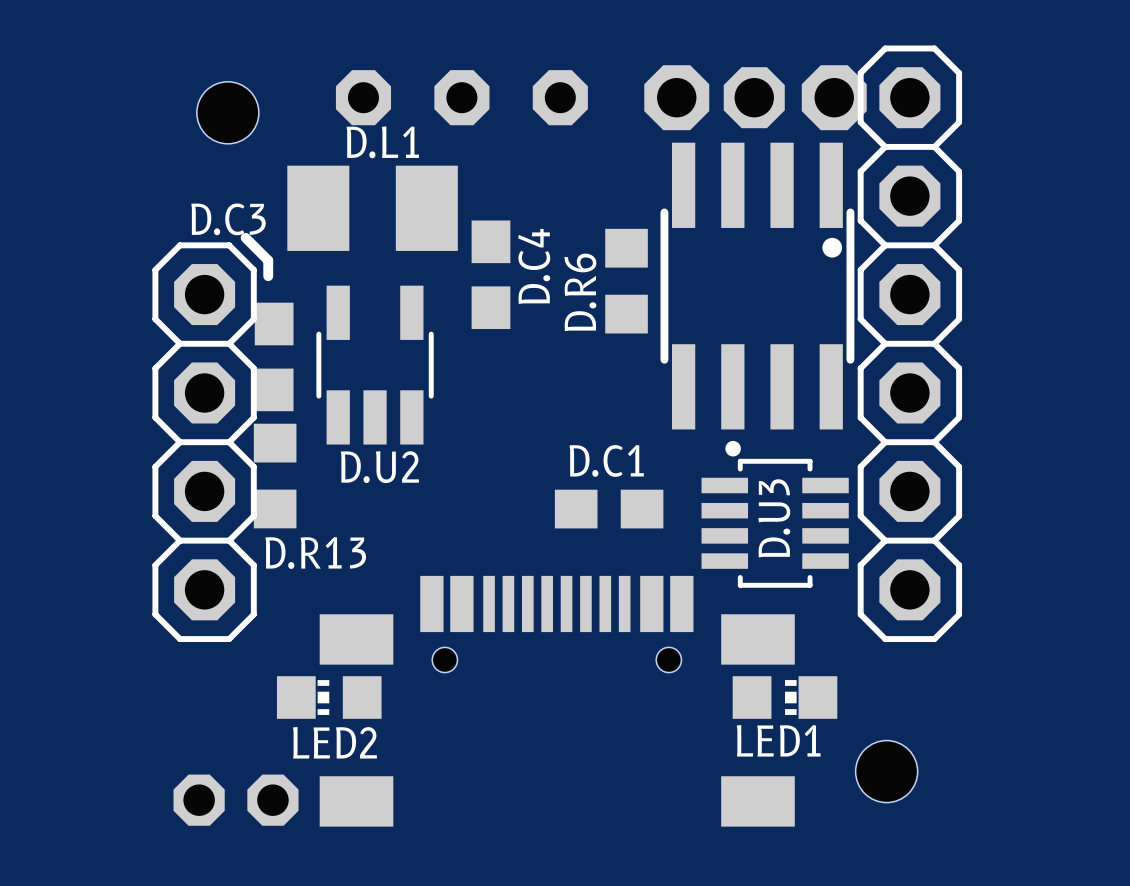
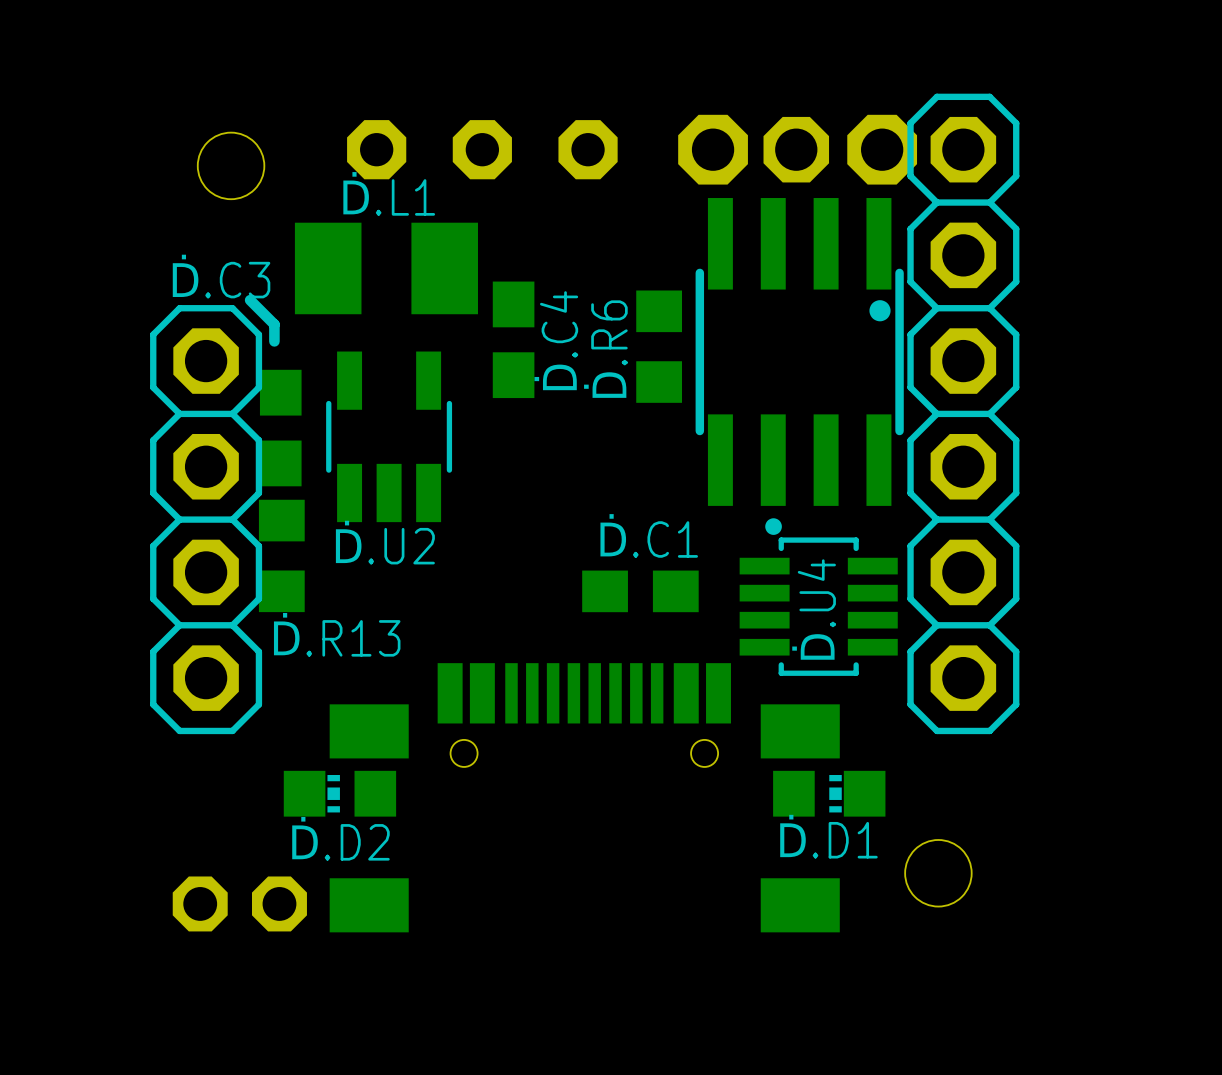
D.L1 name: D.L1 (382, 142) -> Ḋ.L1 (388, 193)
D.C3 name: D.C3 (228, 219) -> Ḋ.C3 (220, 275)
D.C4 name: D.C4 (534, 266) -> Ḋ.C4 (555, 341)
D.R6 name: D.R6 (580, 292) -> Ḋ.R6 (605, 349)
D.C1 name: D.C1 (606, 460) -> Ḋ.C1 (648, 535)
D.U2 name: D.U2 (379, 467) -> Ḋ.U2 (384, 541)
D.U3 name: D.U3 (774, 518) -> Ḋ.U4 (813, 610)
D.R13 name: D.R13 (315, 552) -> Ḋ.R13 (336, 634)
LED1 name: LED1 (778, 740) -> Ḋ.D1 (828, 835)
LED2 name: LED2 (334, 742) -> Ḋ.D2 (340, 838)

